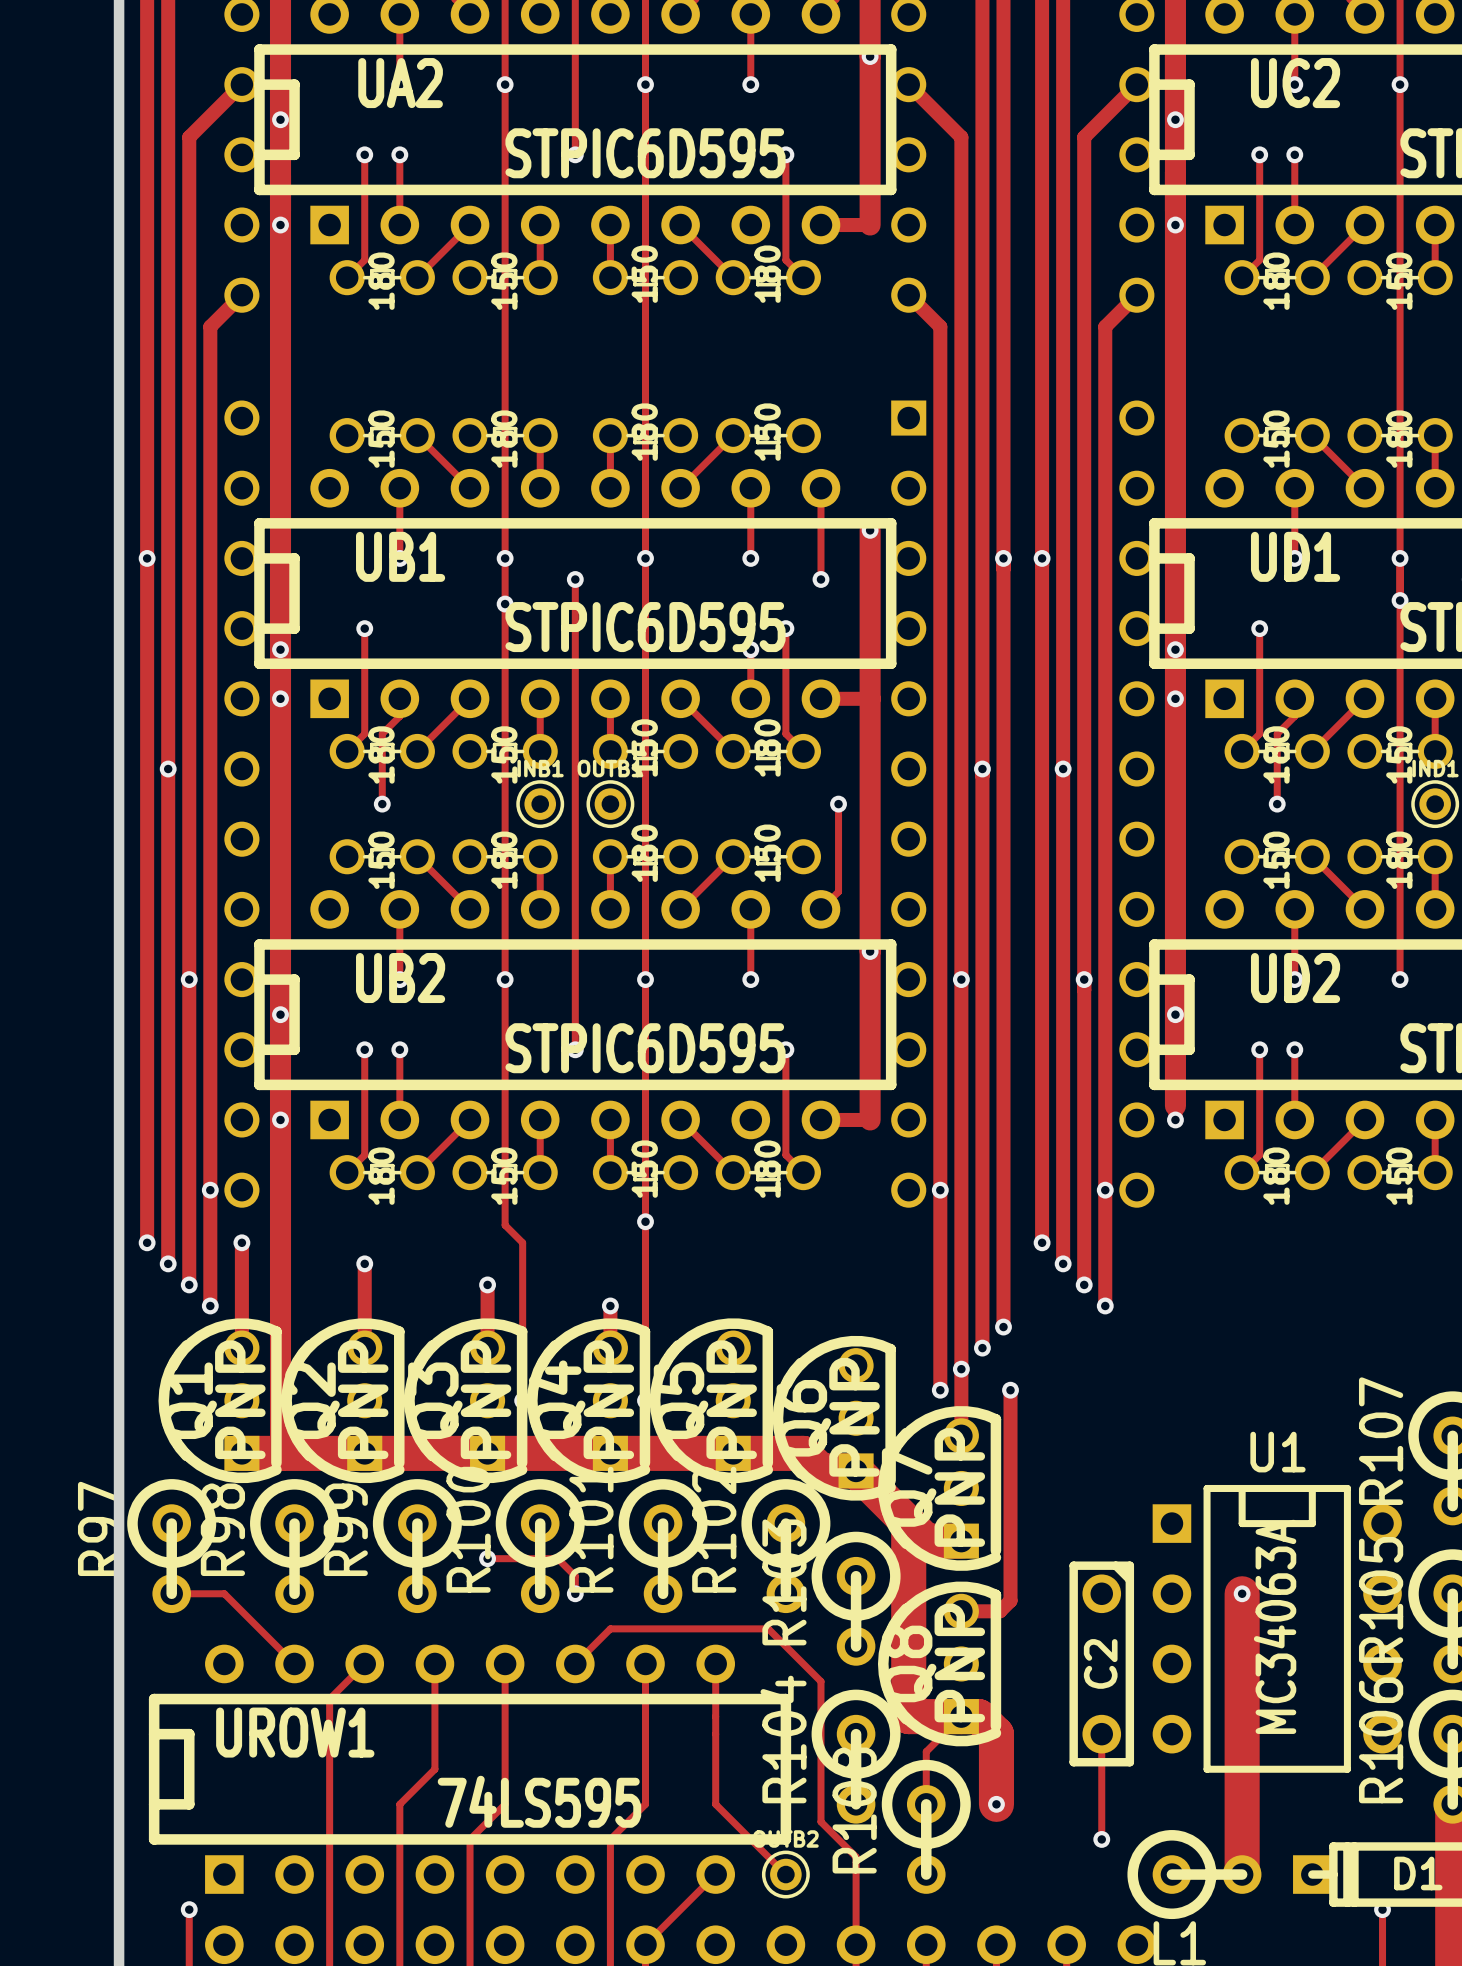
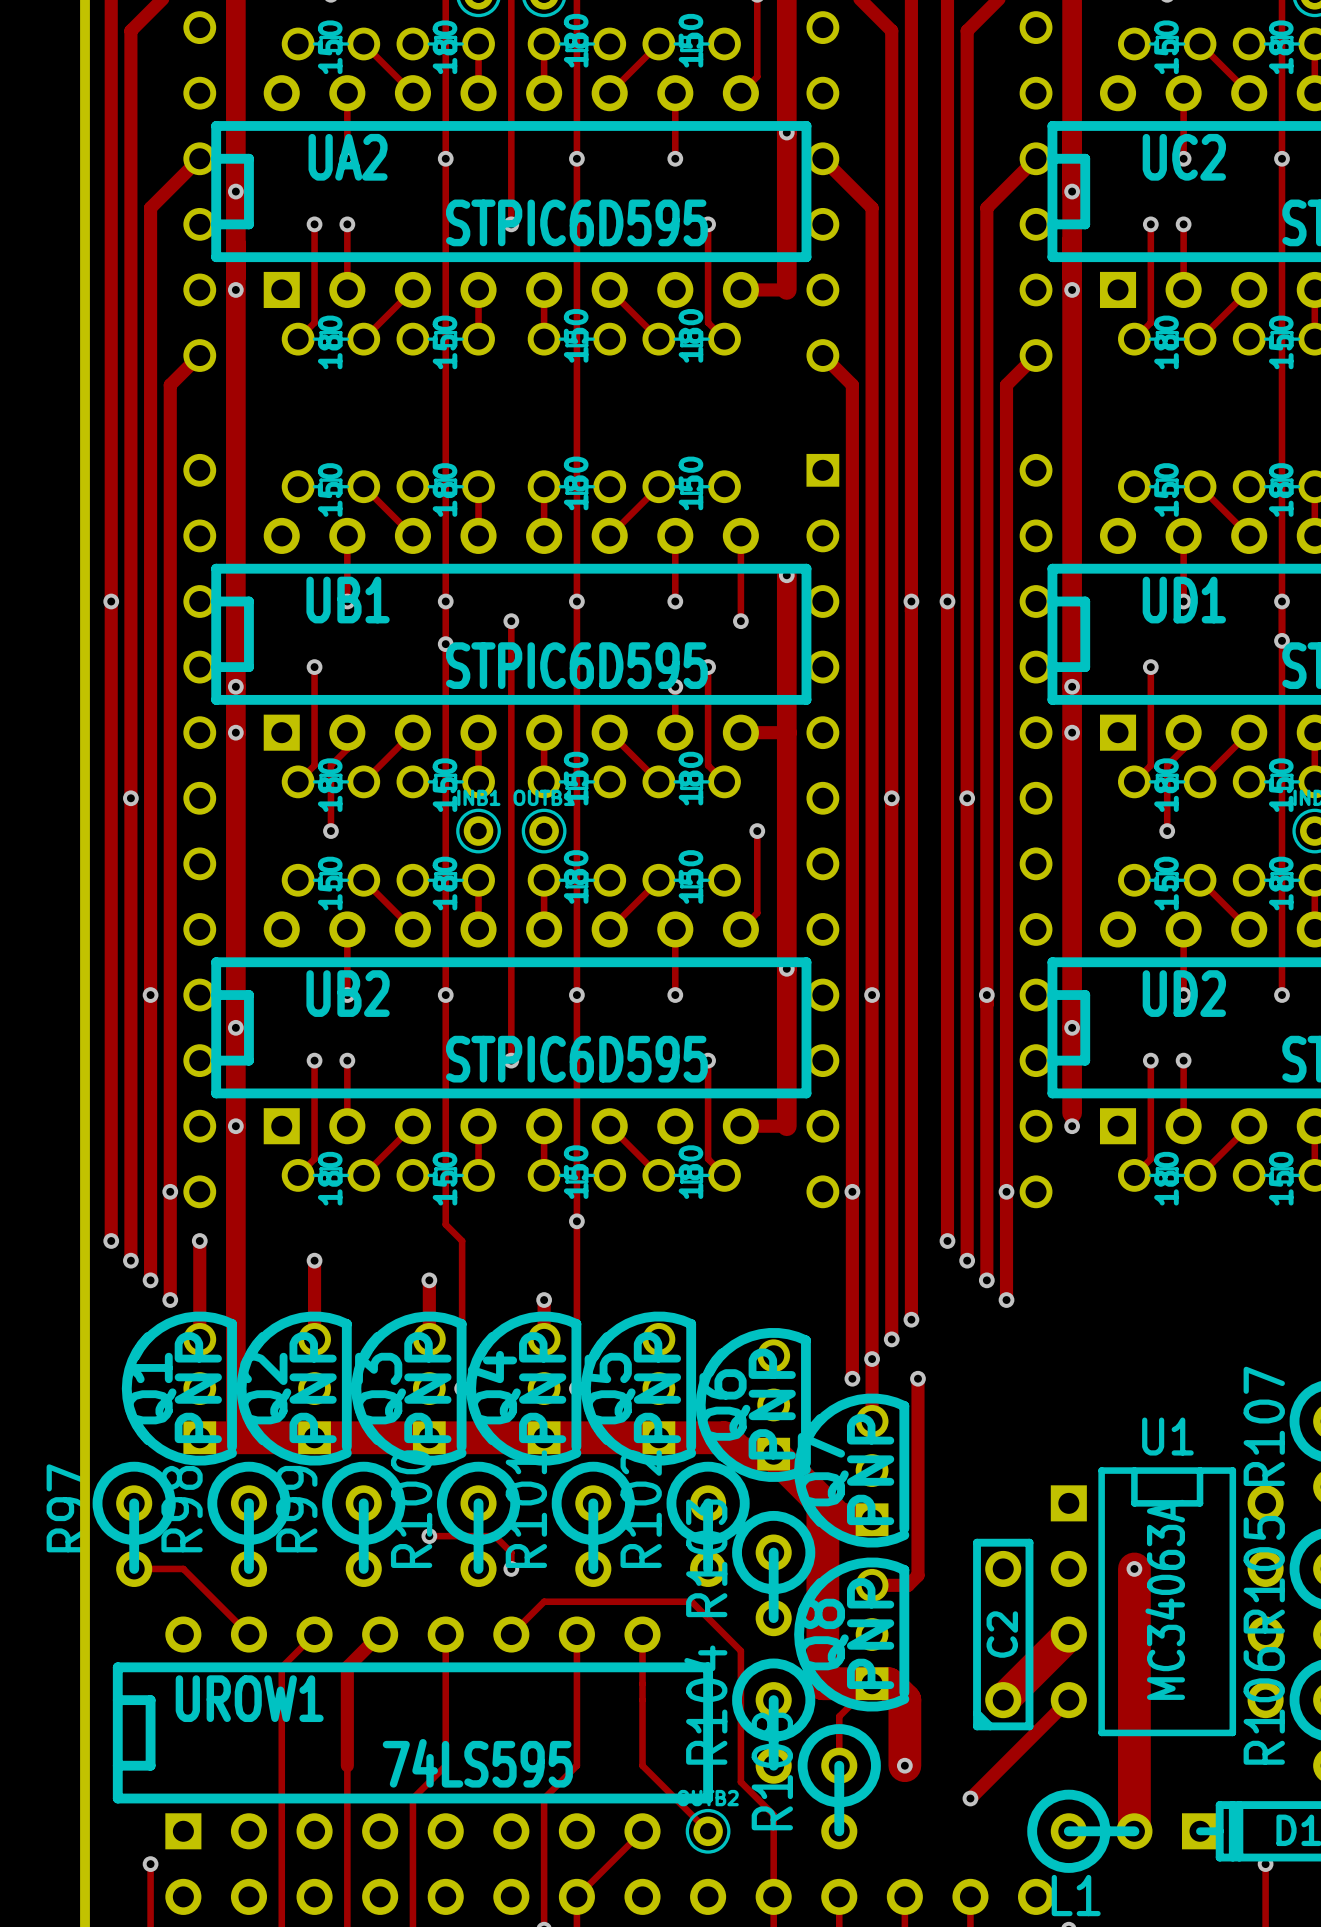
track: (434, 1663) (434, 1769) (399, 1804) -> (380, 1634) (347, 1667) (347, 1765)
C2 rotation: 0° (1101, 1663) -> 180° (1003, 1634)
track: (1101, 1734) (1101, 1839) -> (1003, 1700) (1068, 1634)
track: none -> (1068, 1700) (970, 1798)
via position: (1101, 1839) -> (970, 1798)

